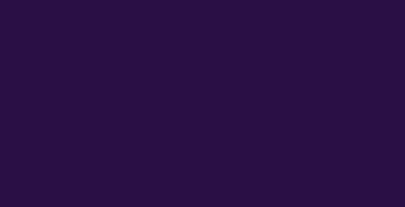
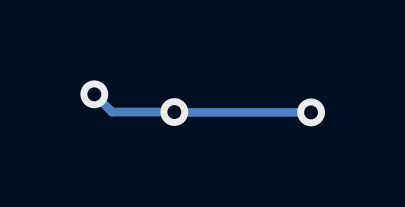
track: none -> (94, 94) (112, 112) (174, 112)
via: none -> (94, 94)
via: none -> (174, 112)
track: none -> (311, 112) (174, 112)
via: none -> (311, 112)

